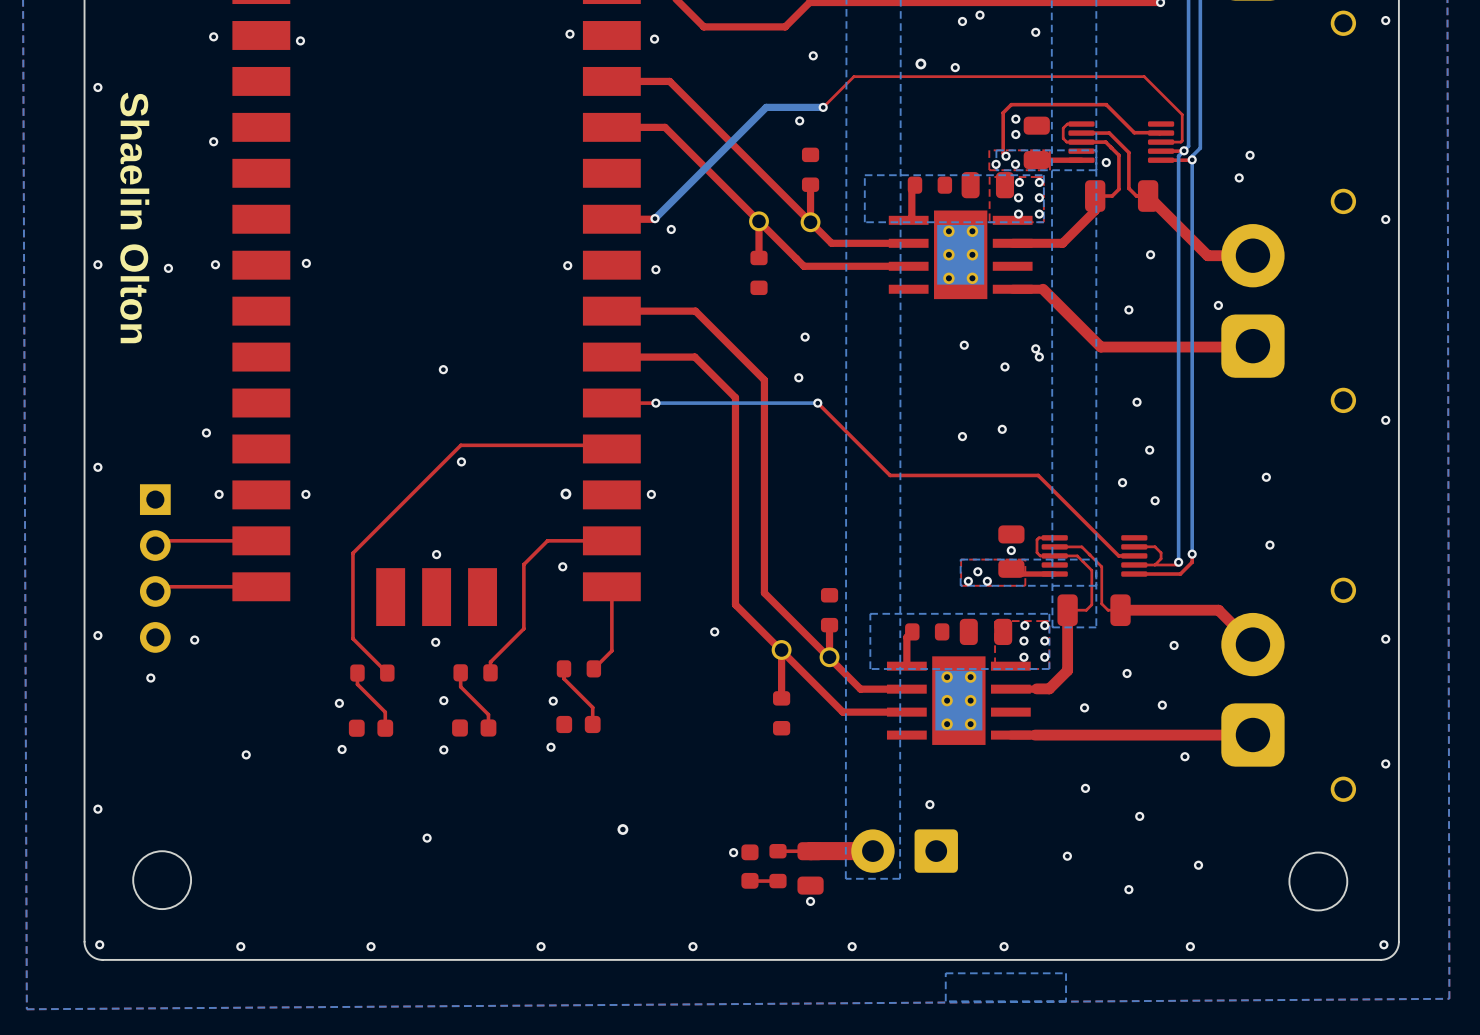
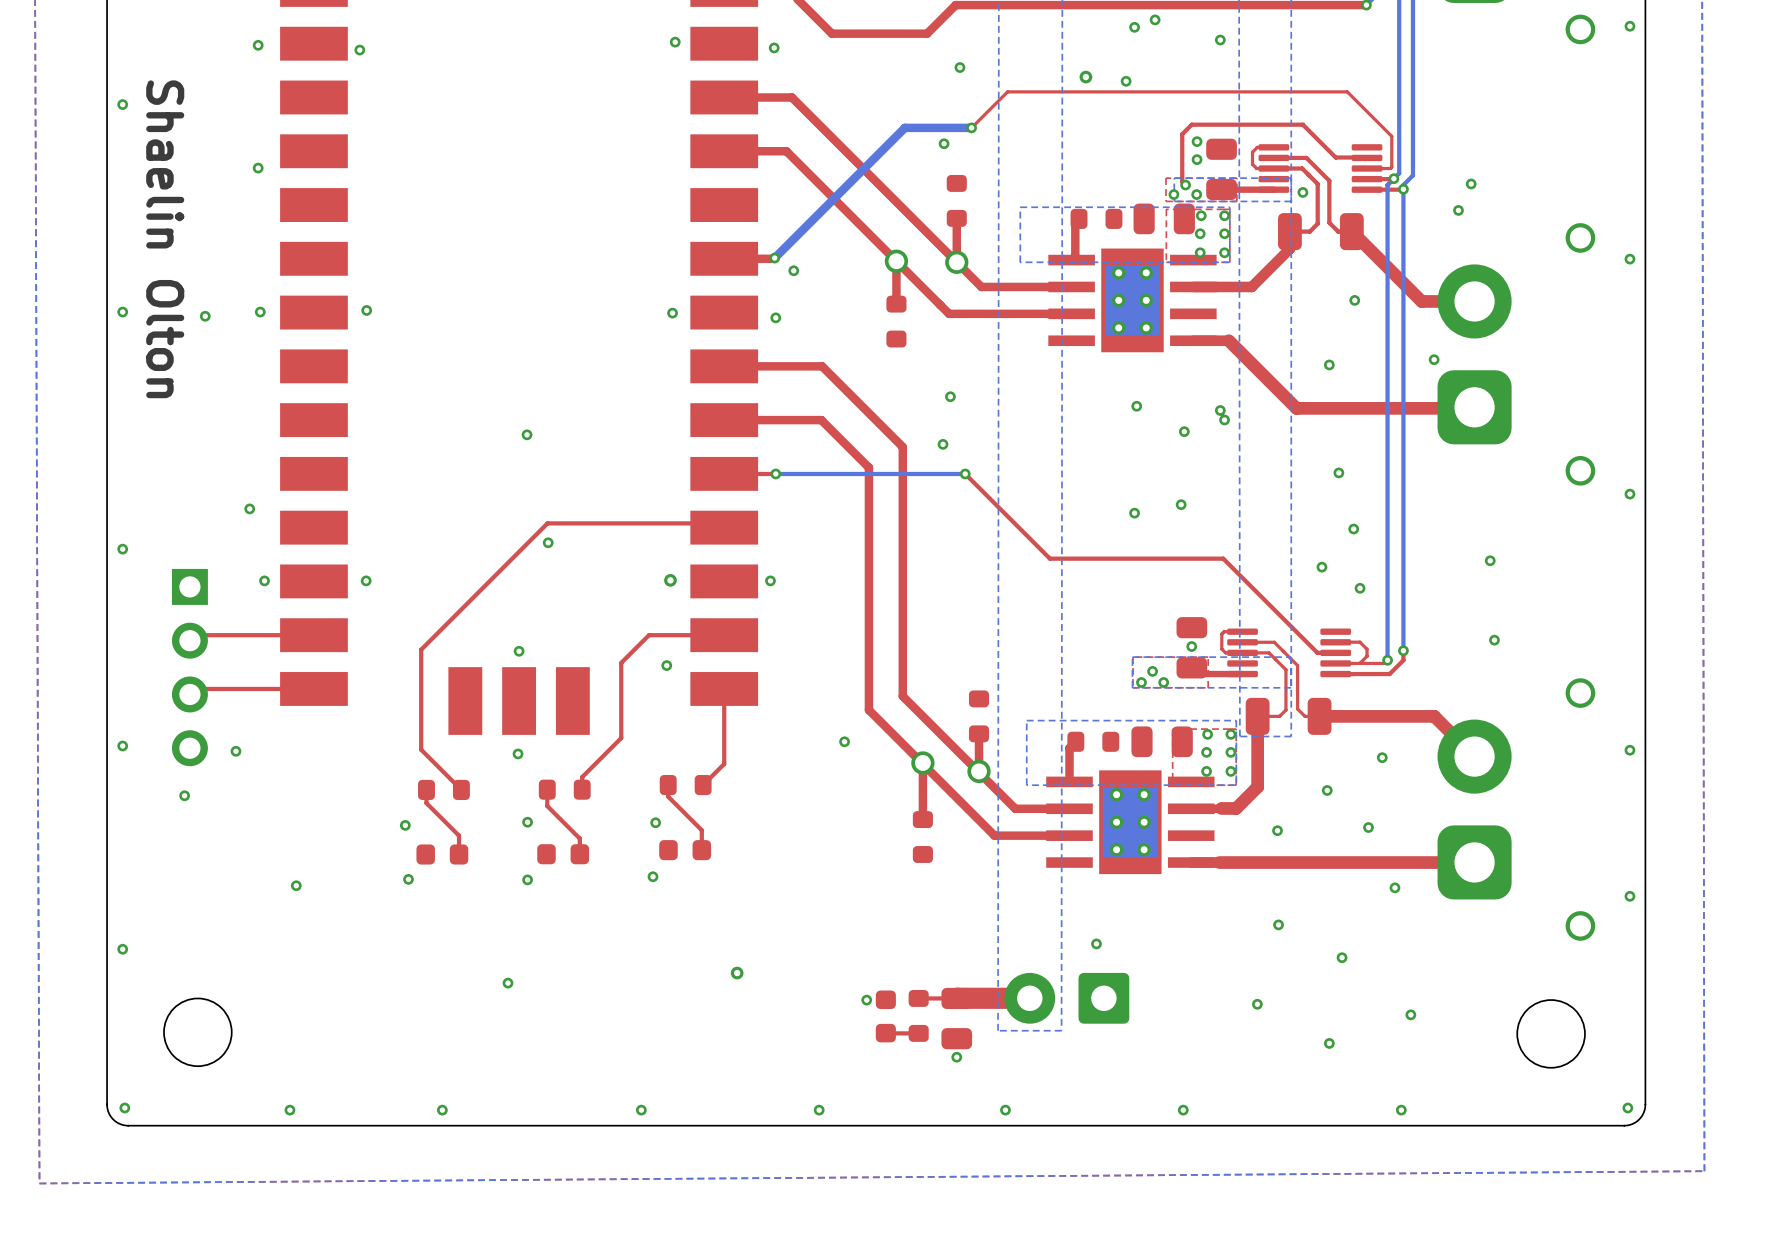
bottom zone outline: (1066, 973) (945, 973) (945, 1001) (1066, 1001) (1066, 973) -> none

